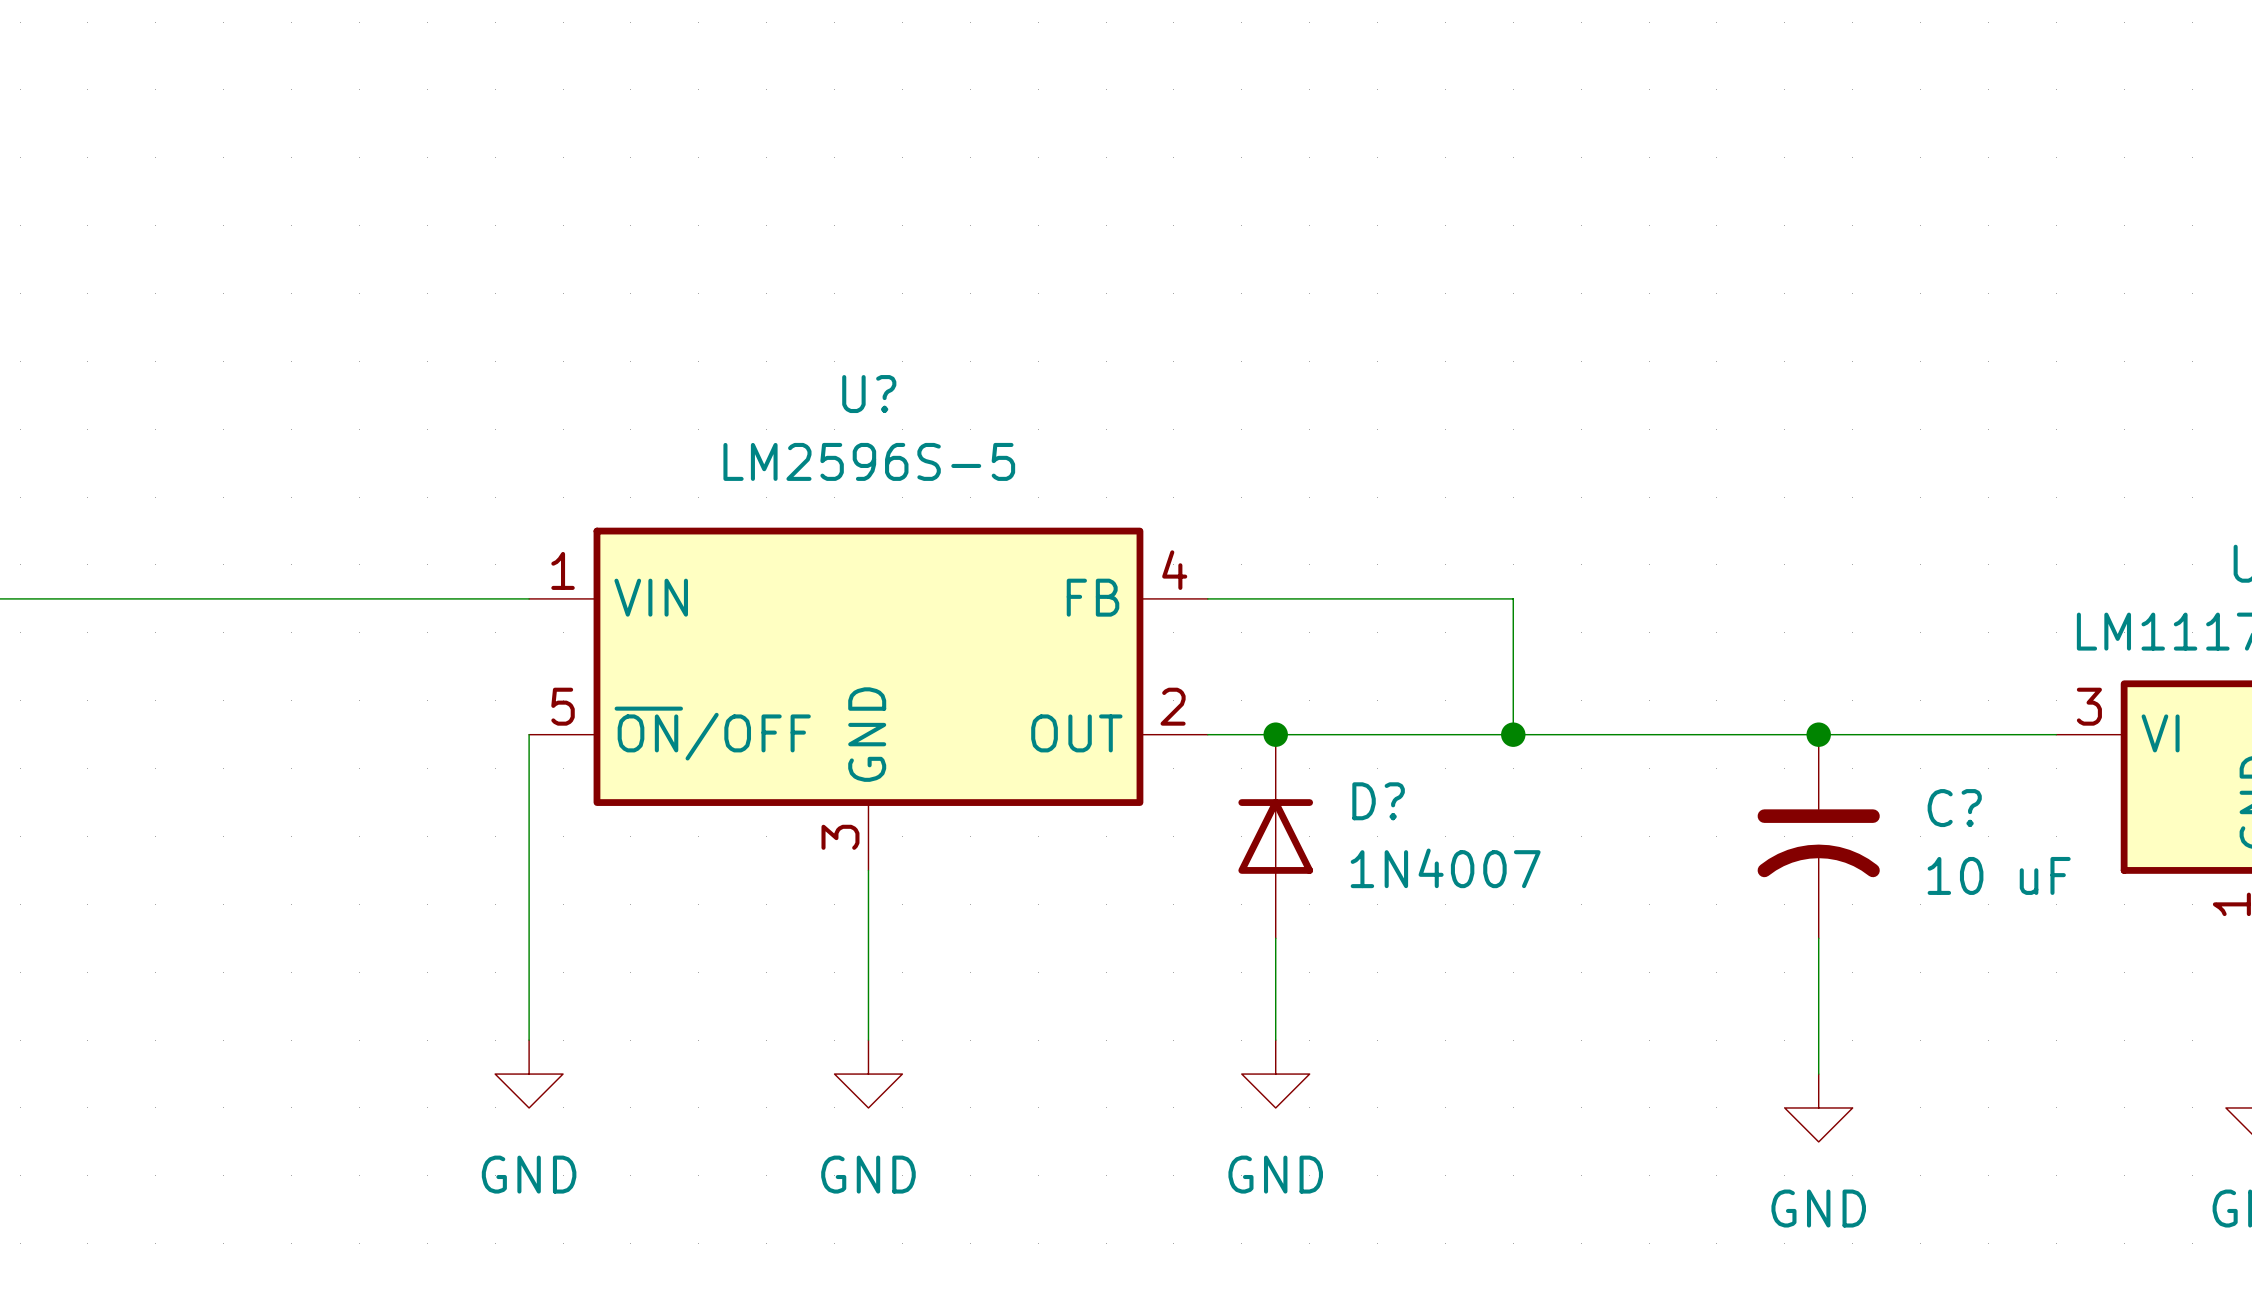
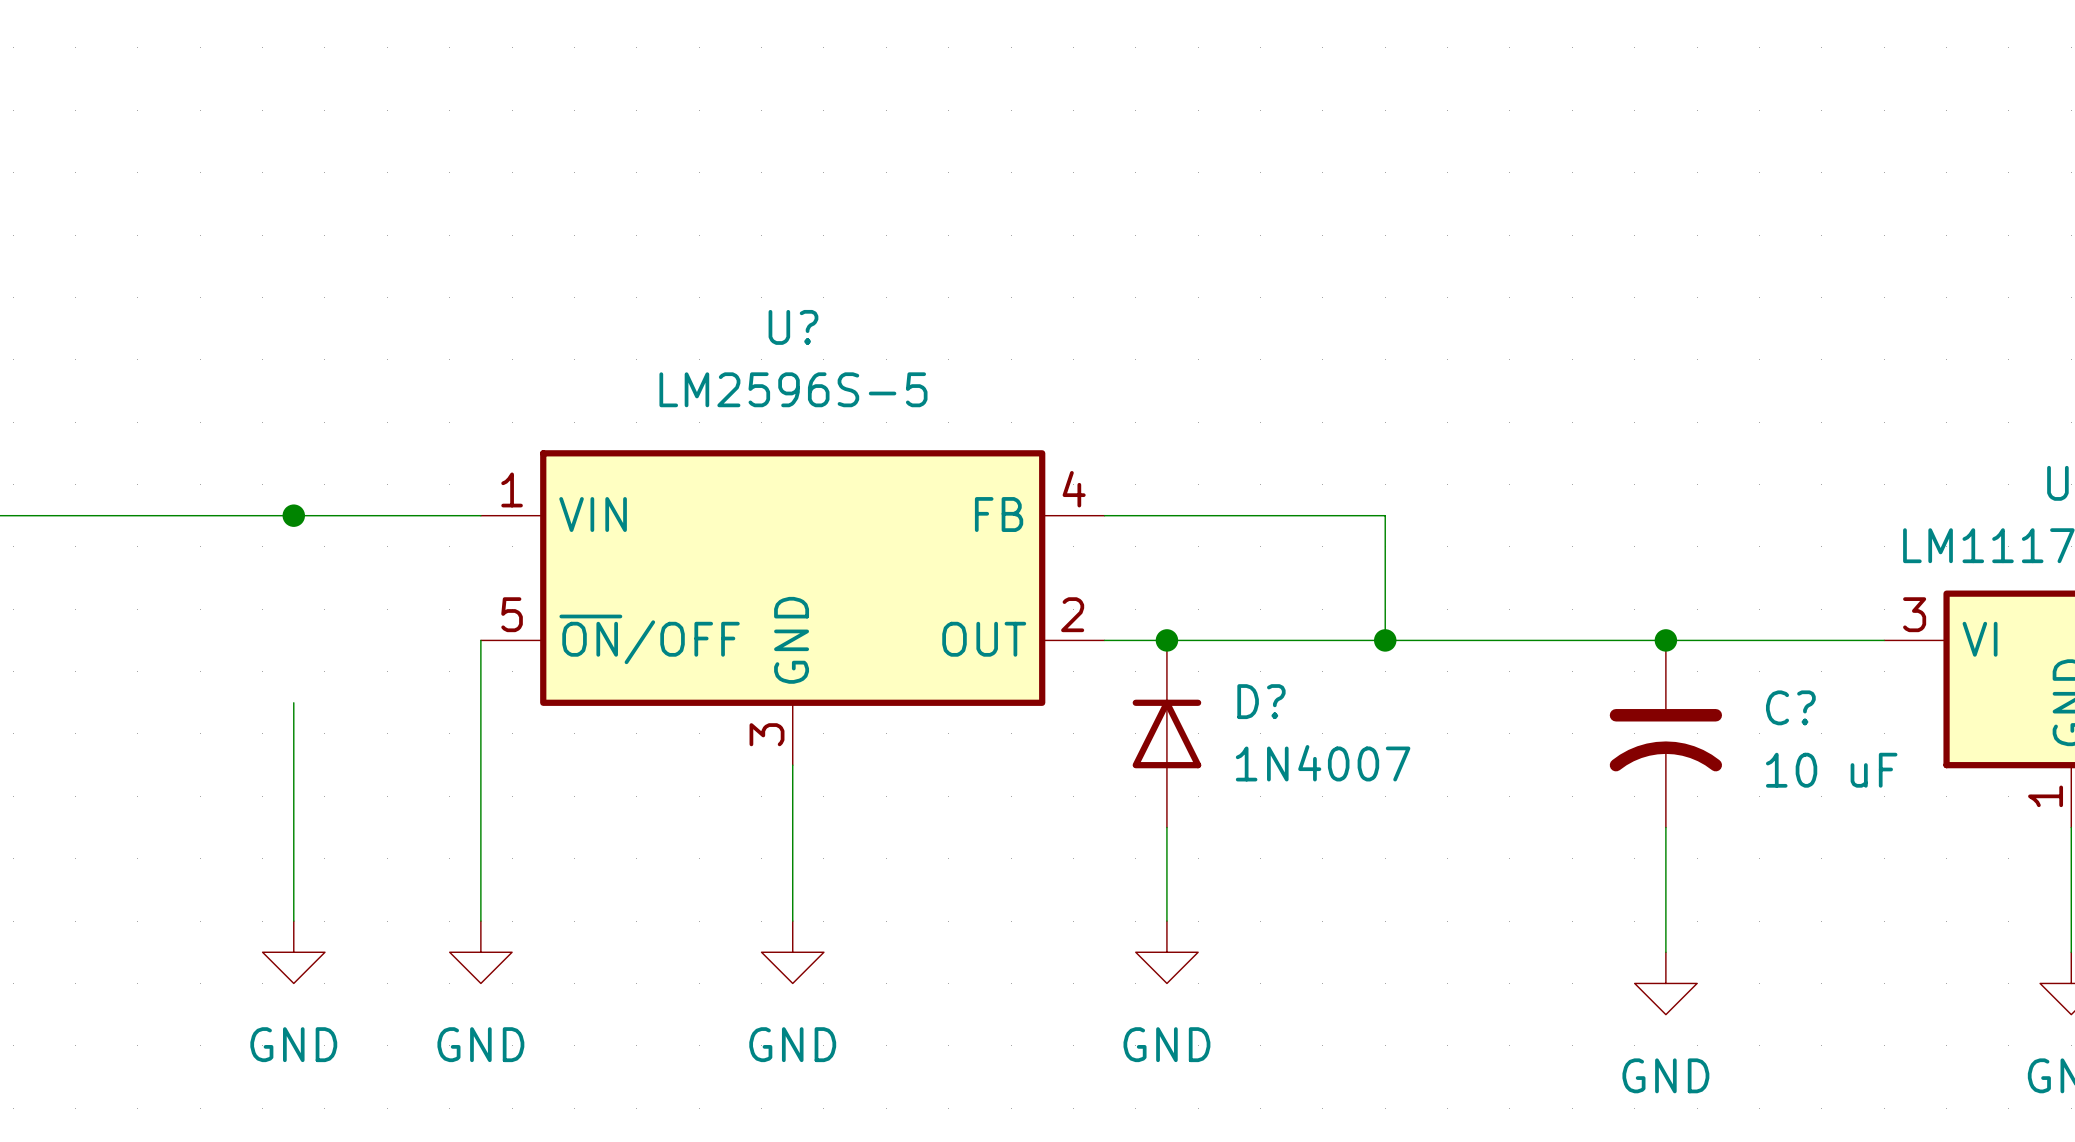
junction: none -> (293, 515)
wire: none -> (293, 702) (293, 921)
power symbol: none -> GND (293, 952)

